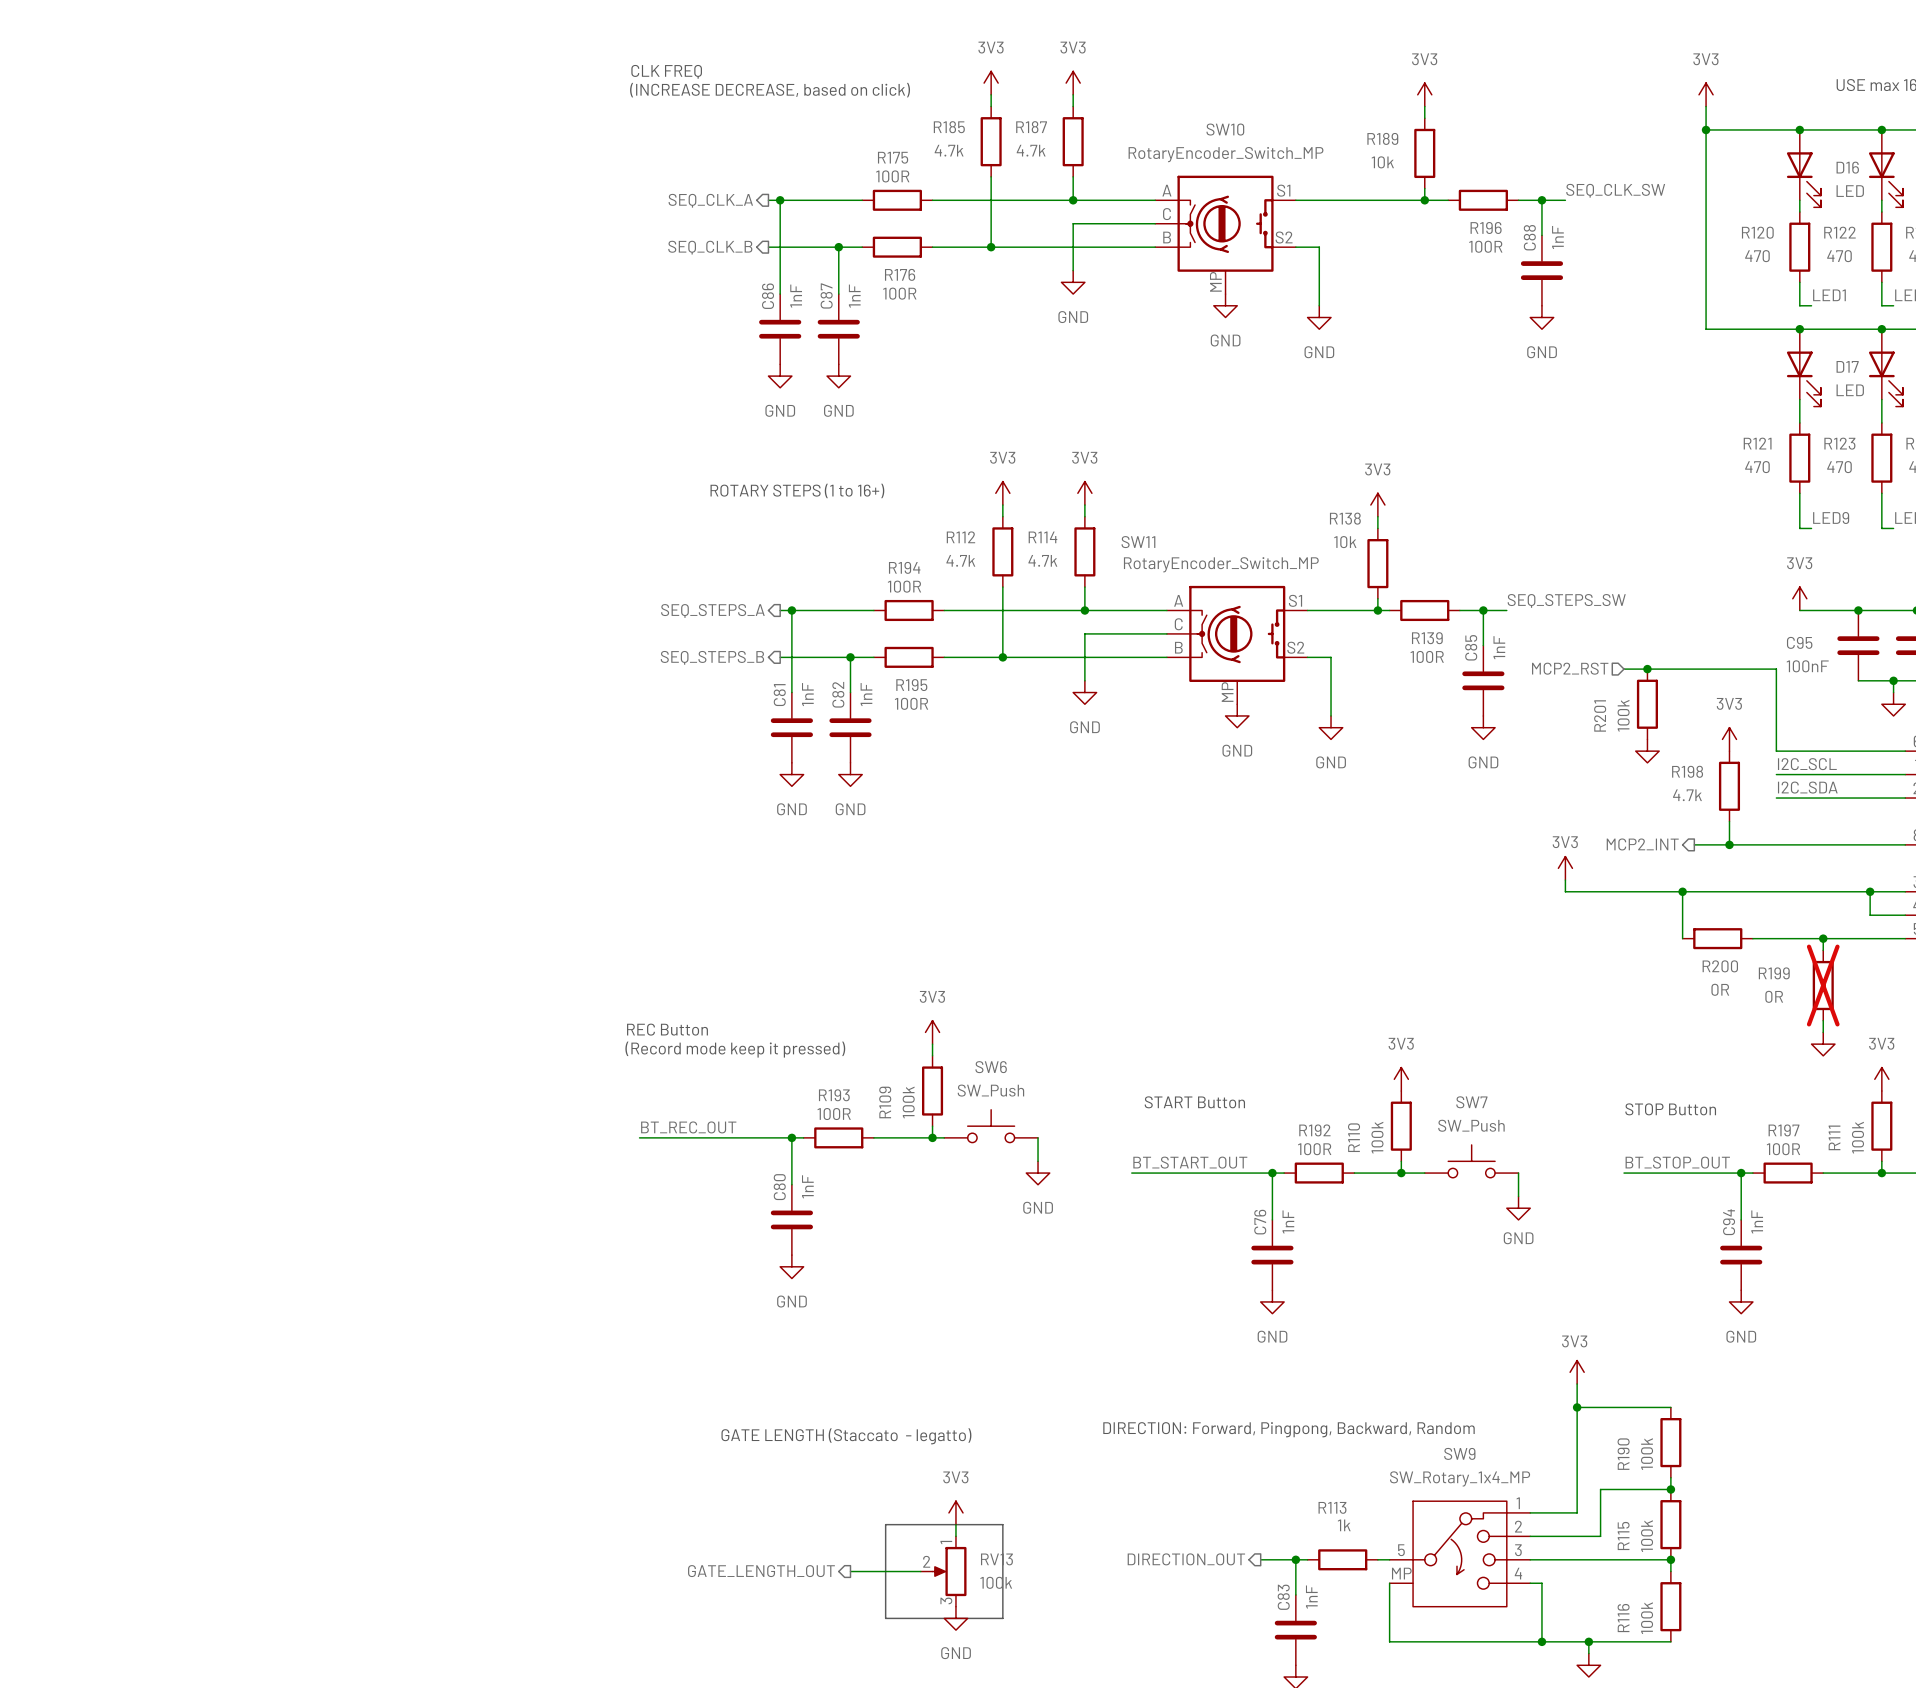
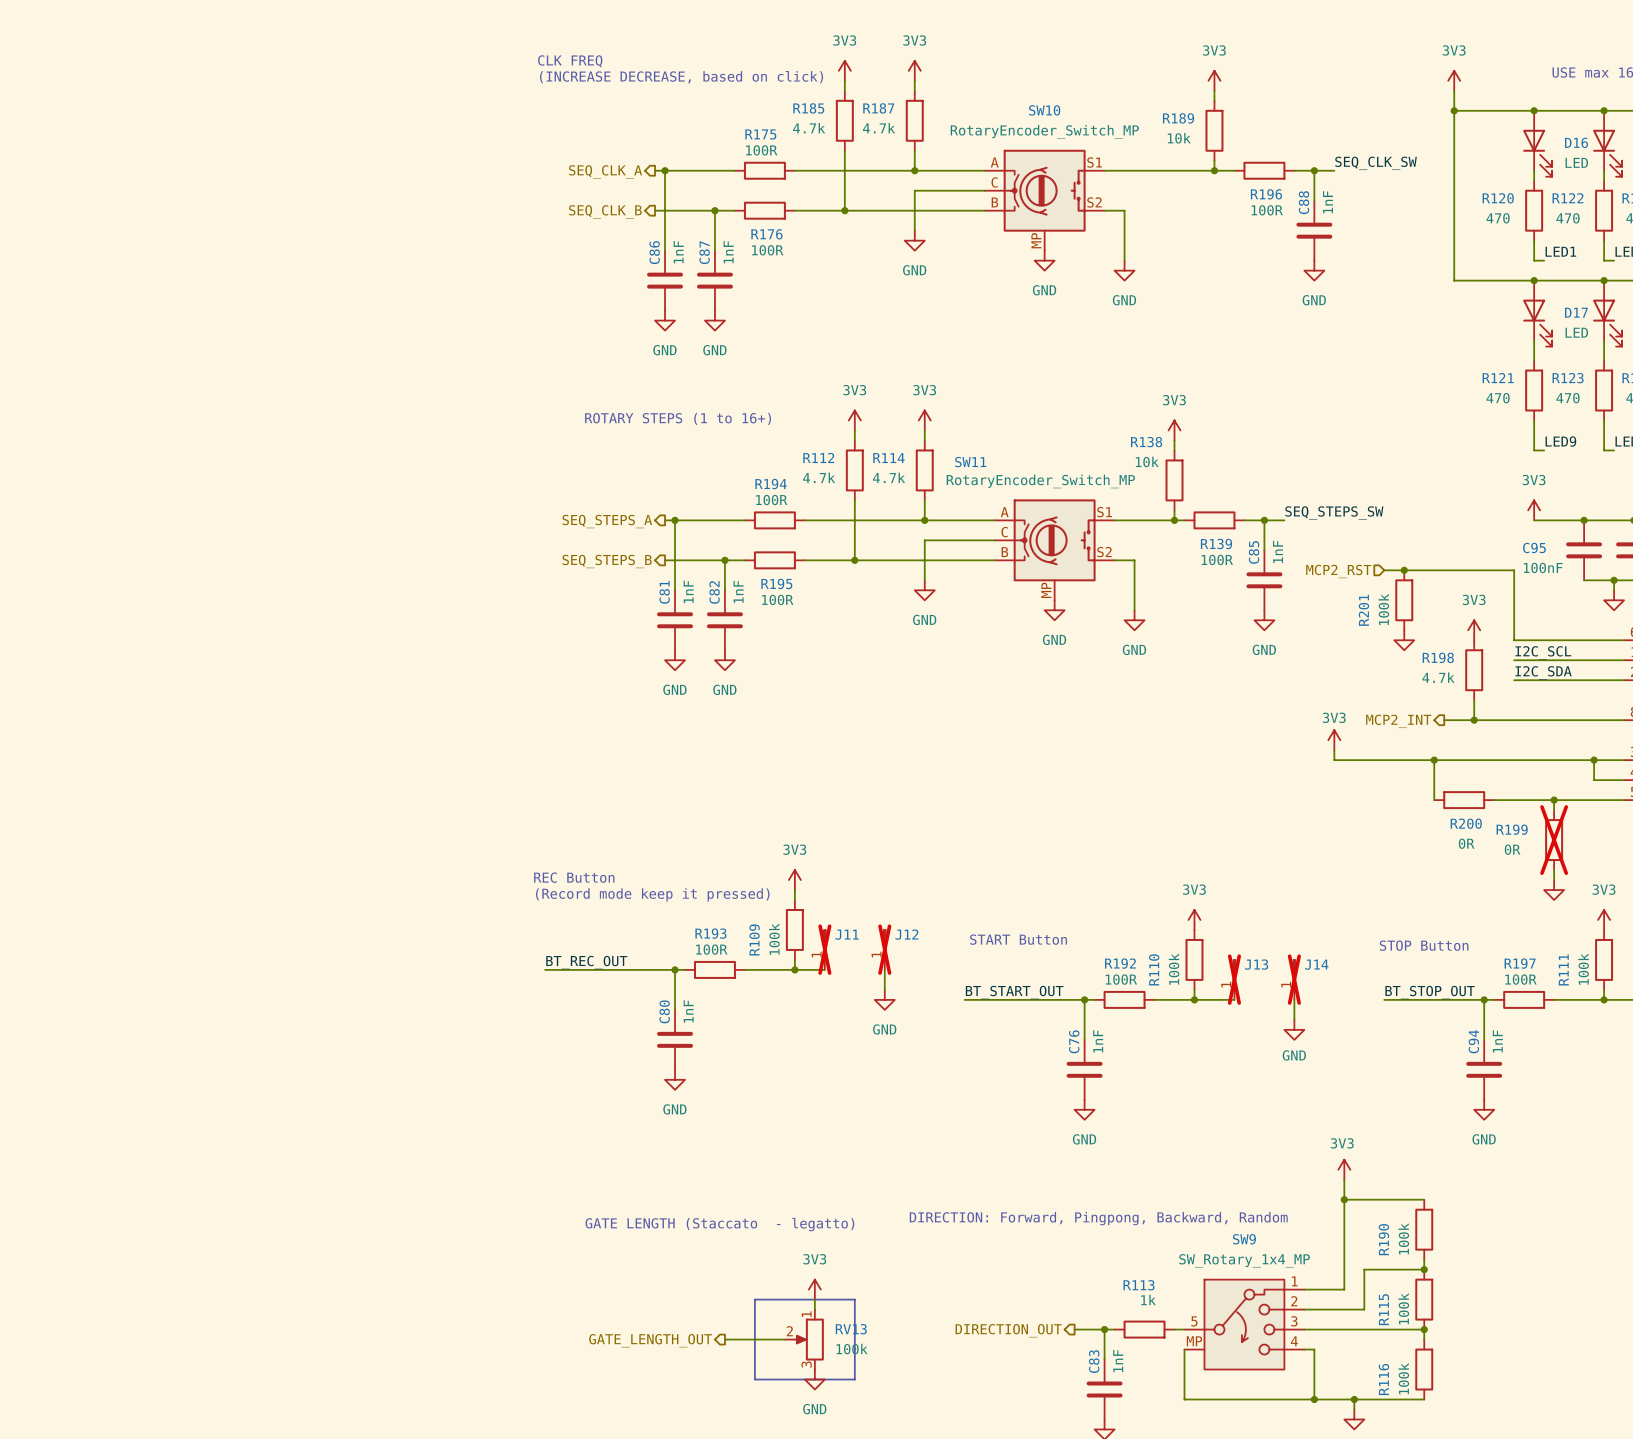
J11: none -> (824, 949)
J12: none -> (884, 949)
SW6: SW_Push (991, 1126) -> none
J13: none -> (1234, 979)
J14: none -> (1294, 979)
SW7: SW_Push (1471, 1161) -> none

